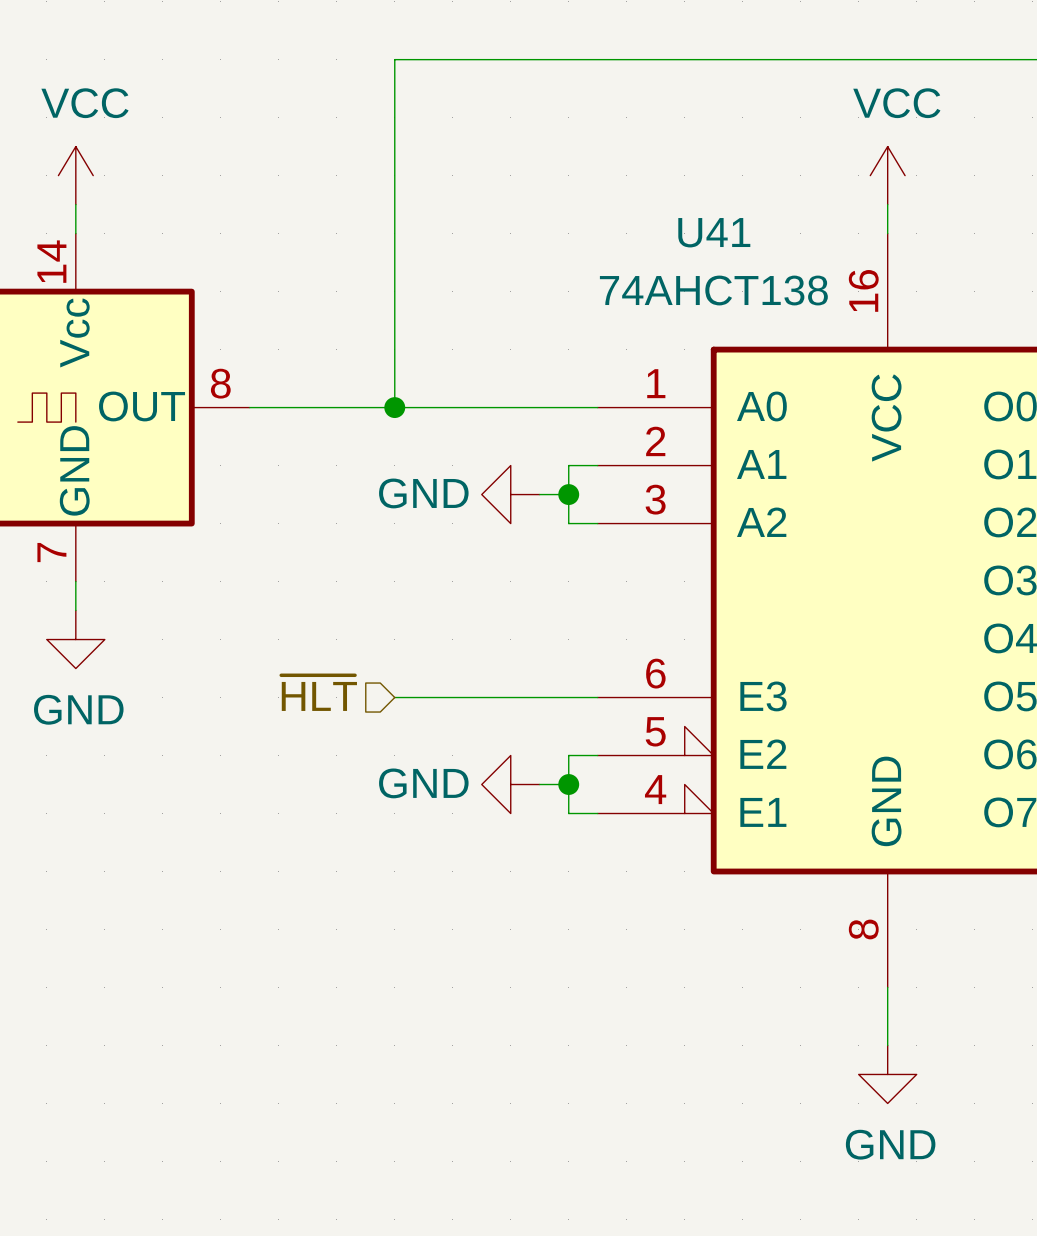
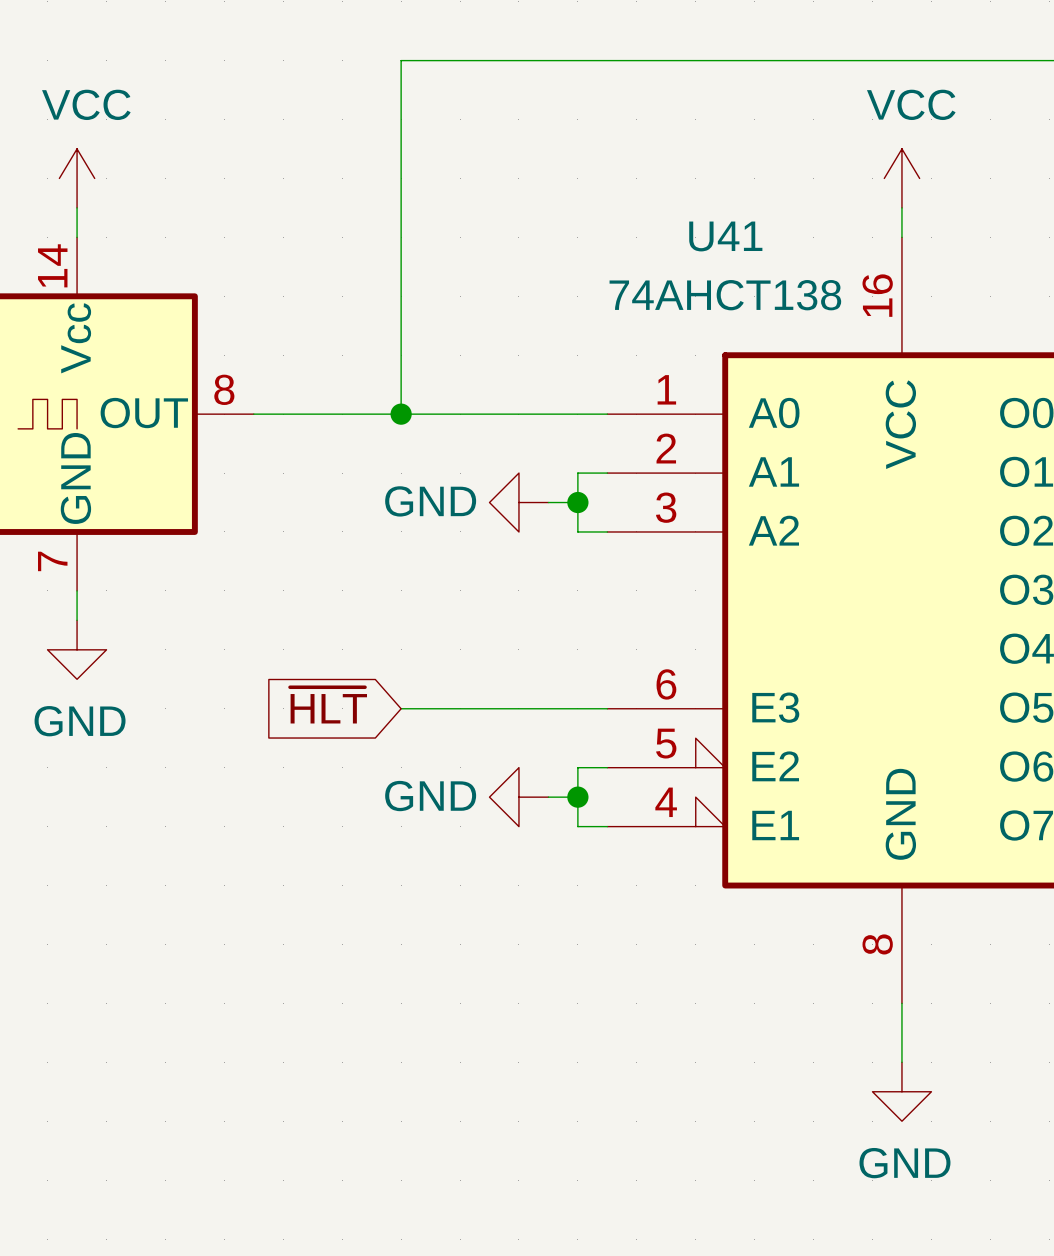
hierarchical label: ~{HLT} (319, 693) -> none
global label: none -> ~{HLT} (328, 705)

